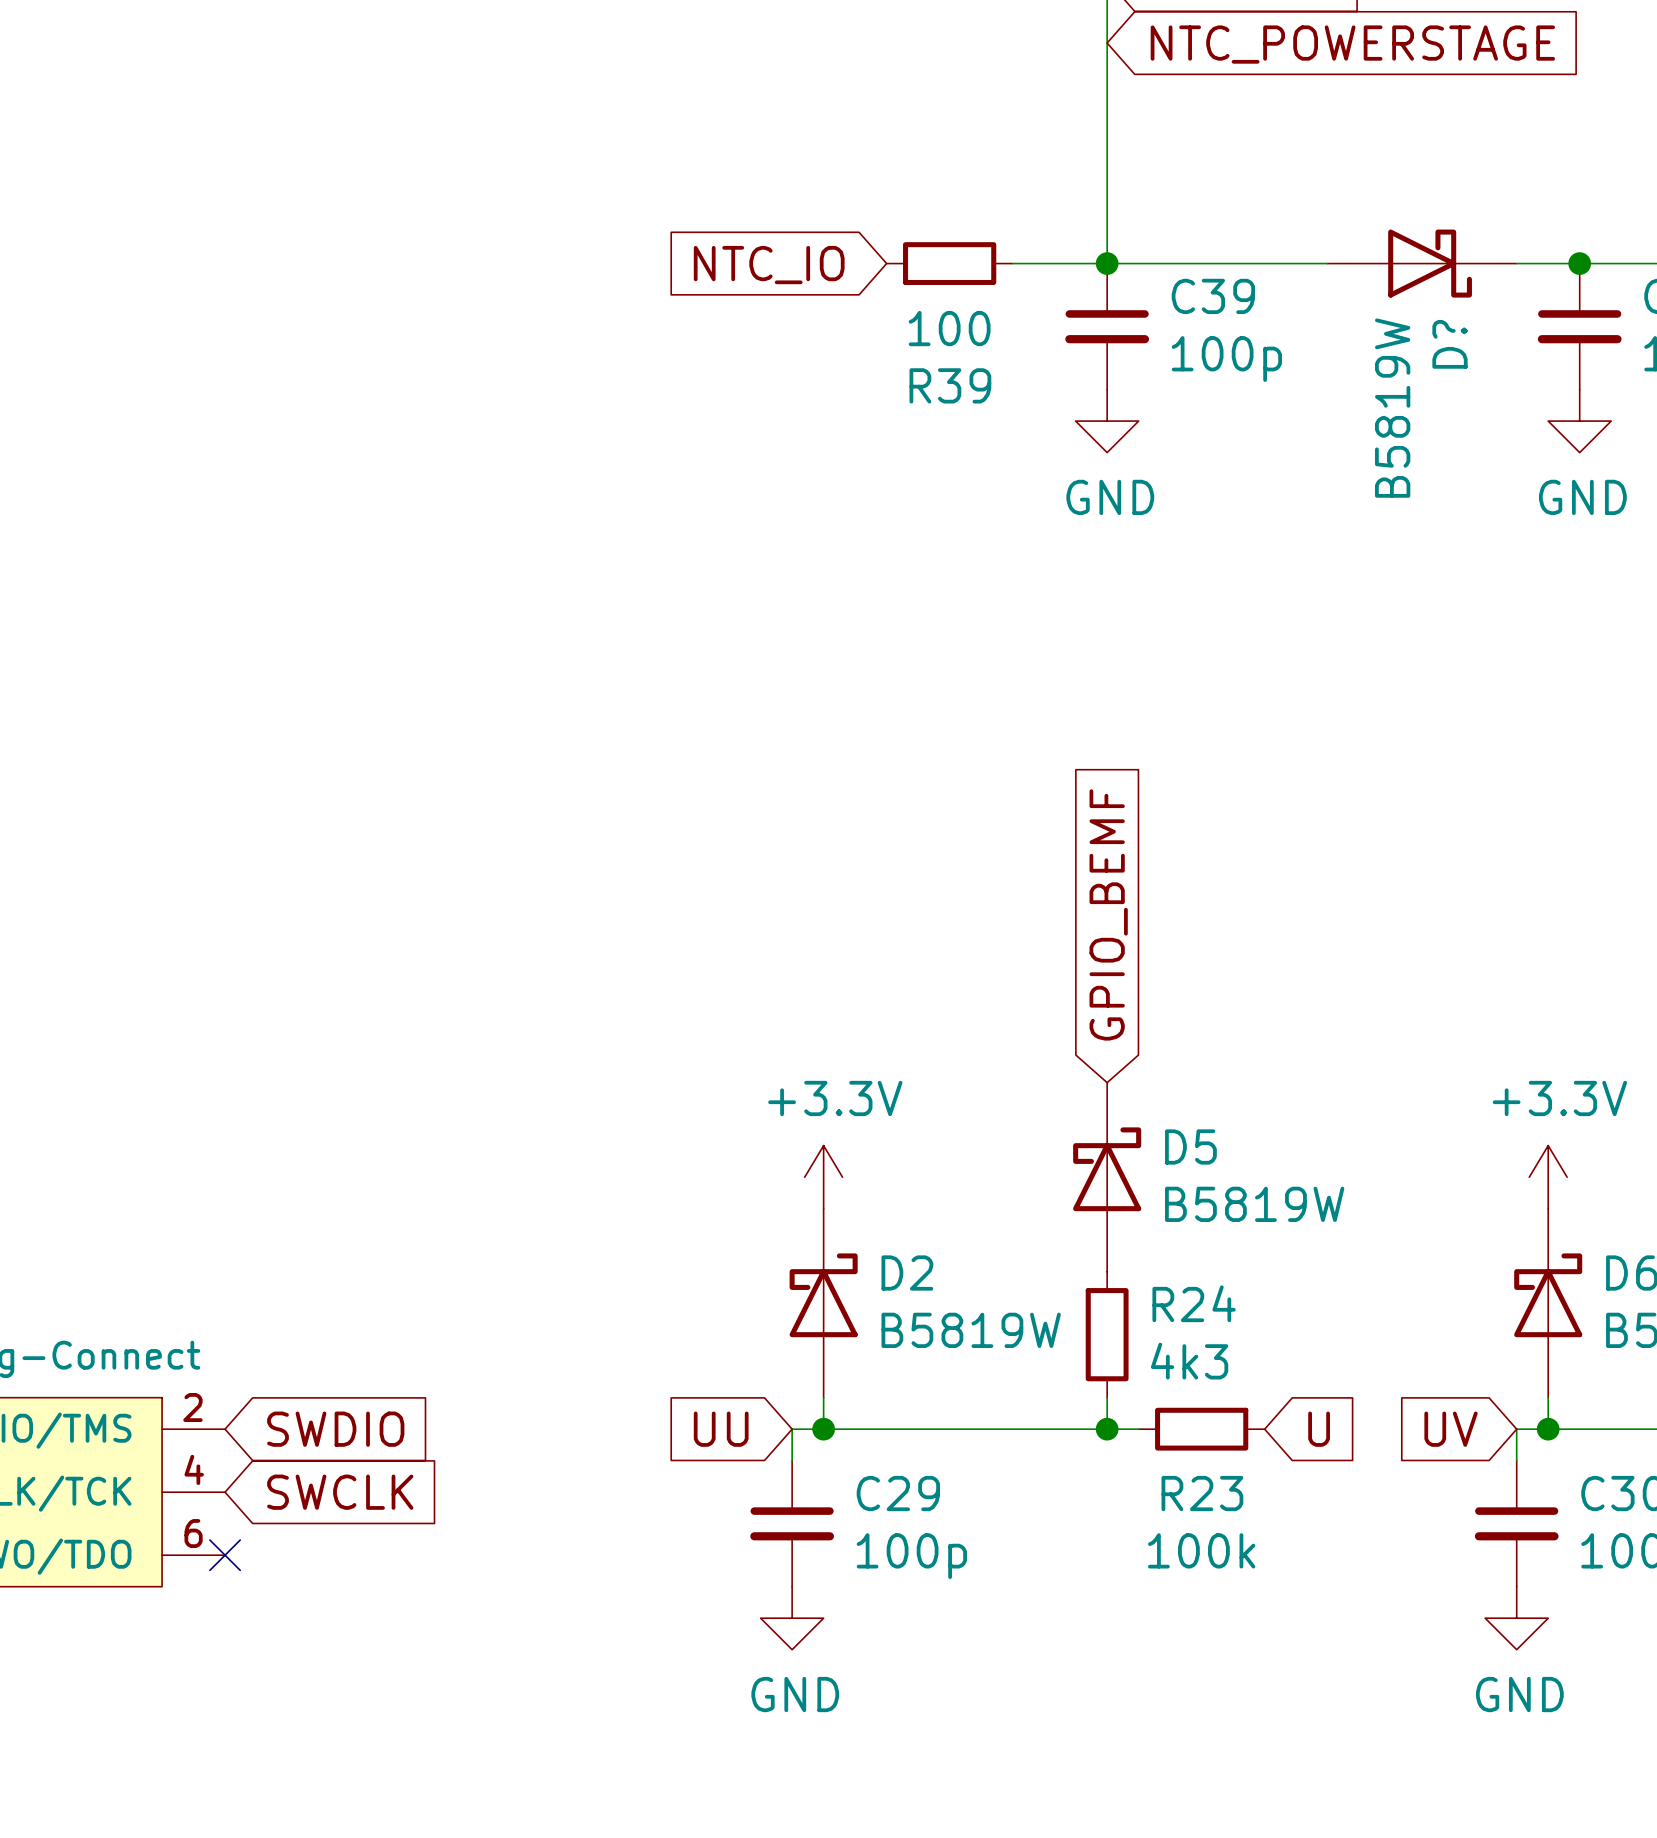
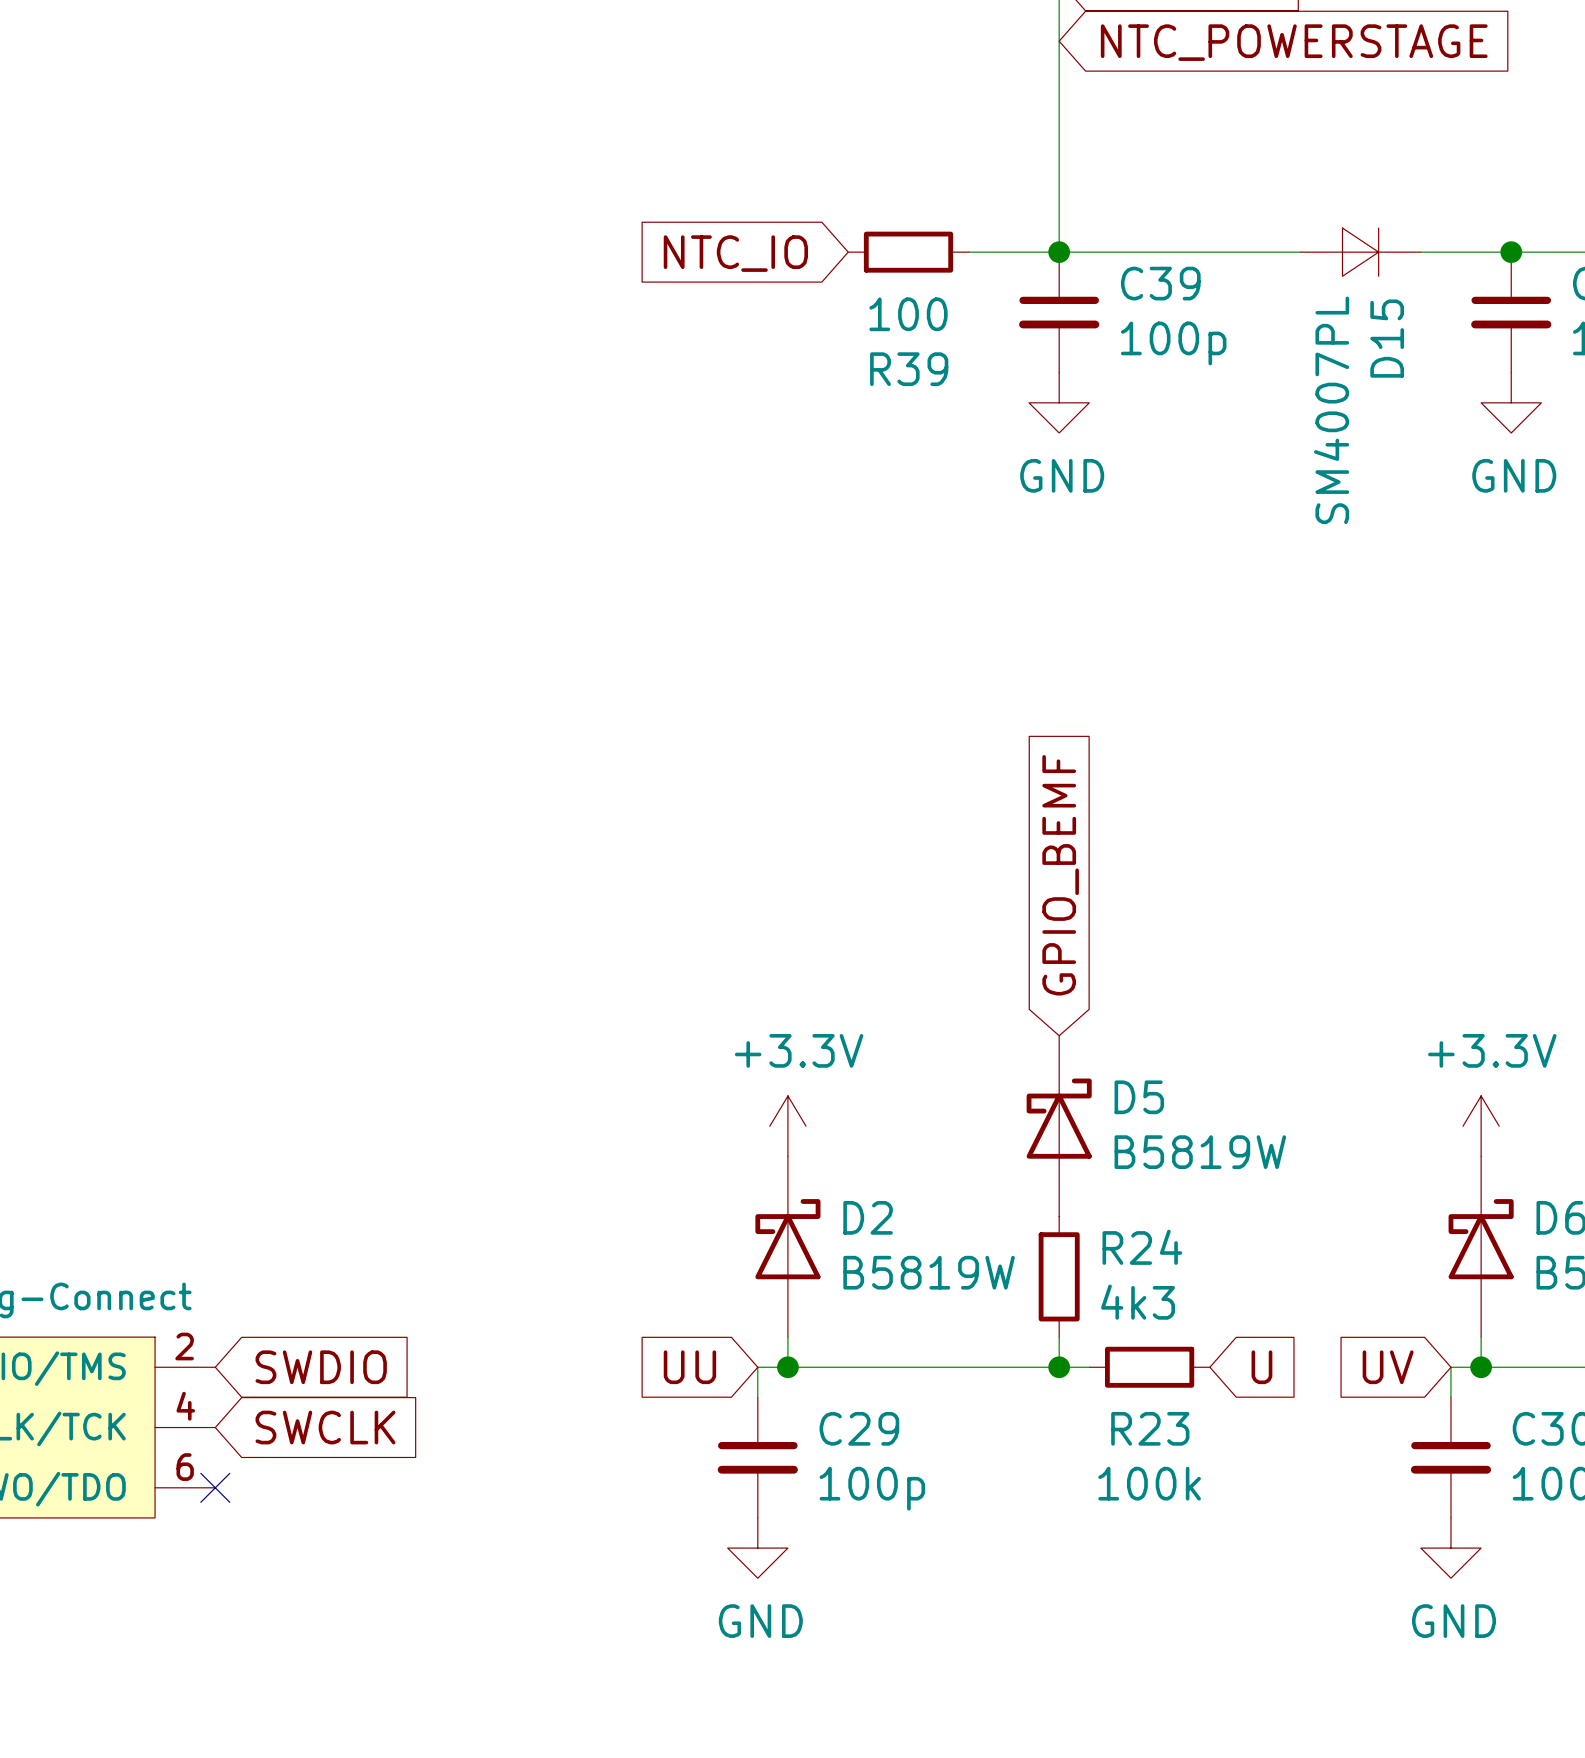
D?: B5819W (1422, 263) -> none
D15: none -> SM4007PL (1360, 252)

